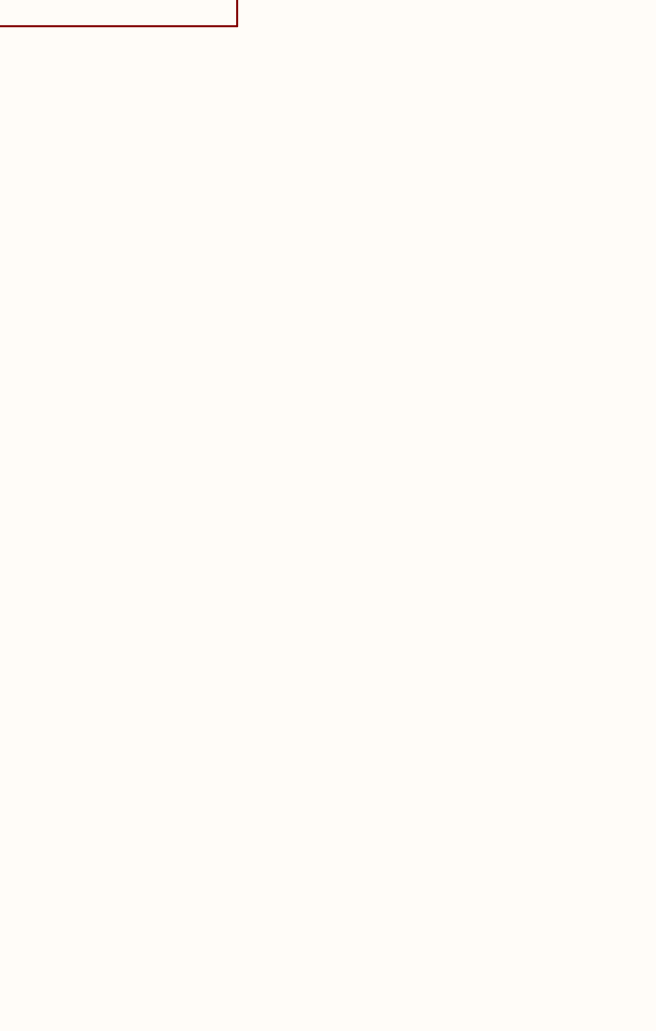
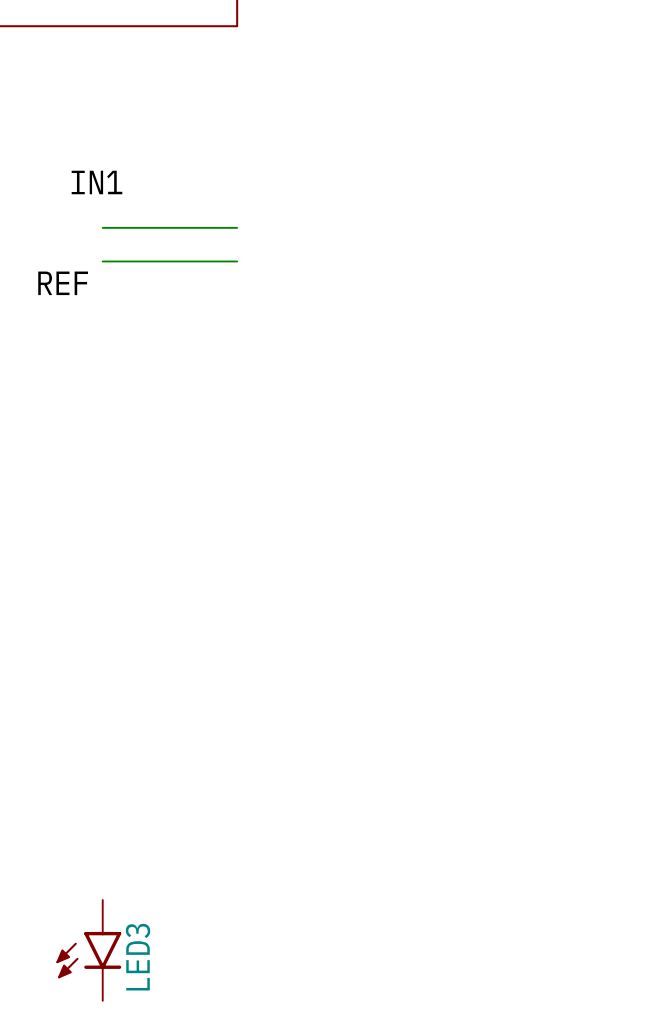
label: none -> IN1 (96, 182)
wire: none -> (102, 227) (237, 227)
wire: none -> (102, 261) (237, 261)
label: none -> REF (63, 283)
LED3: none -> (88, 950)

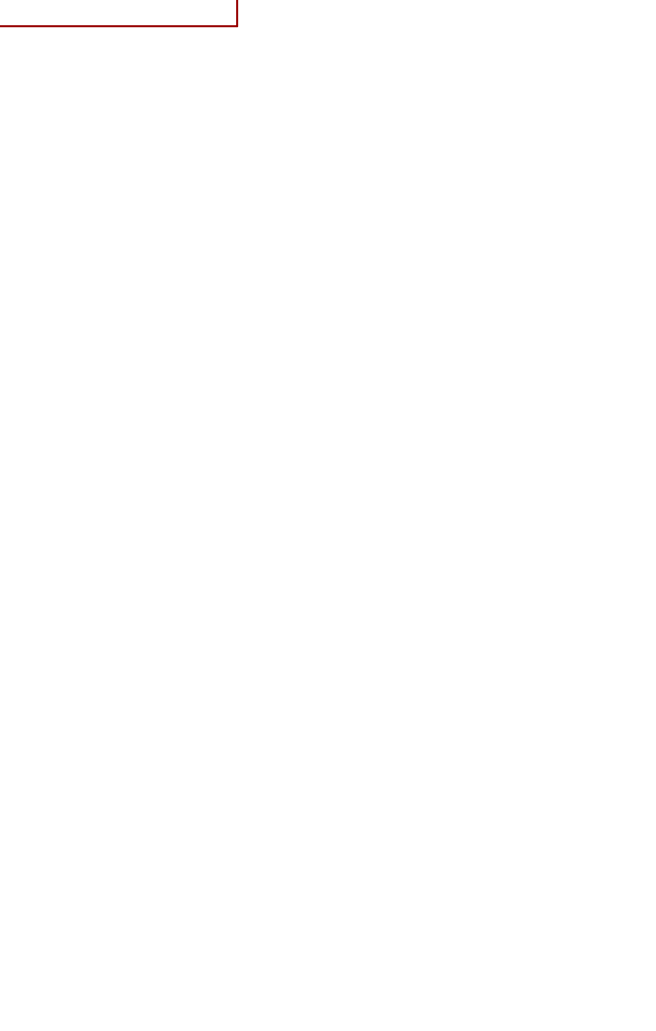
label: IN1 (96, 182) -> none
wire: (102, 227) (237, 227) -> none
wire: (102, 261) (237, 261) -> none
label: REF (63, 283) -> none
LED3: (88, 950) -> none

